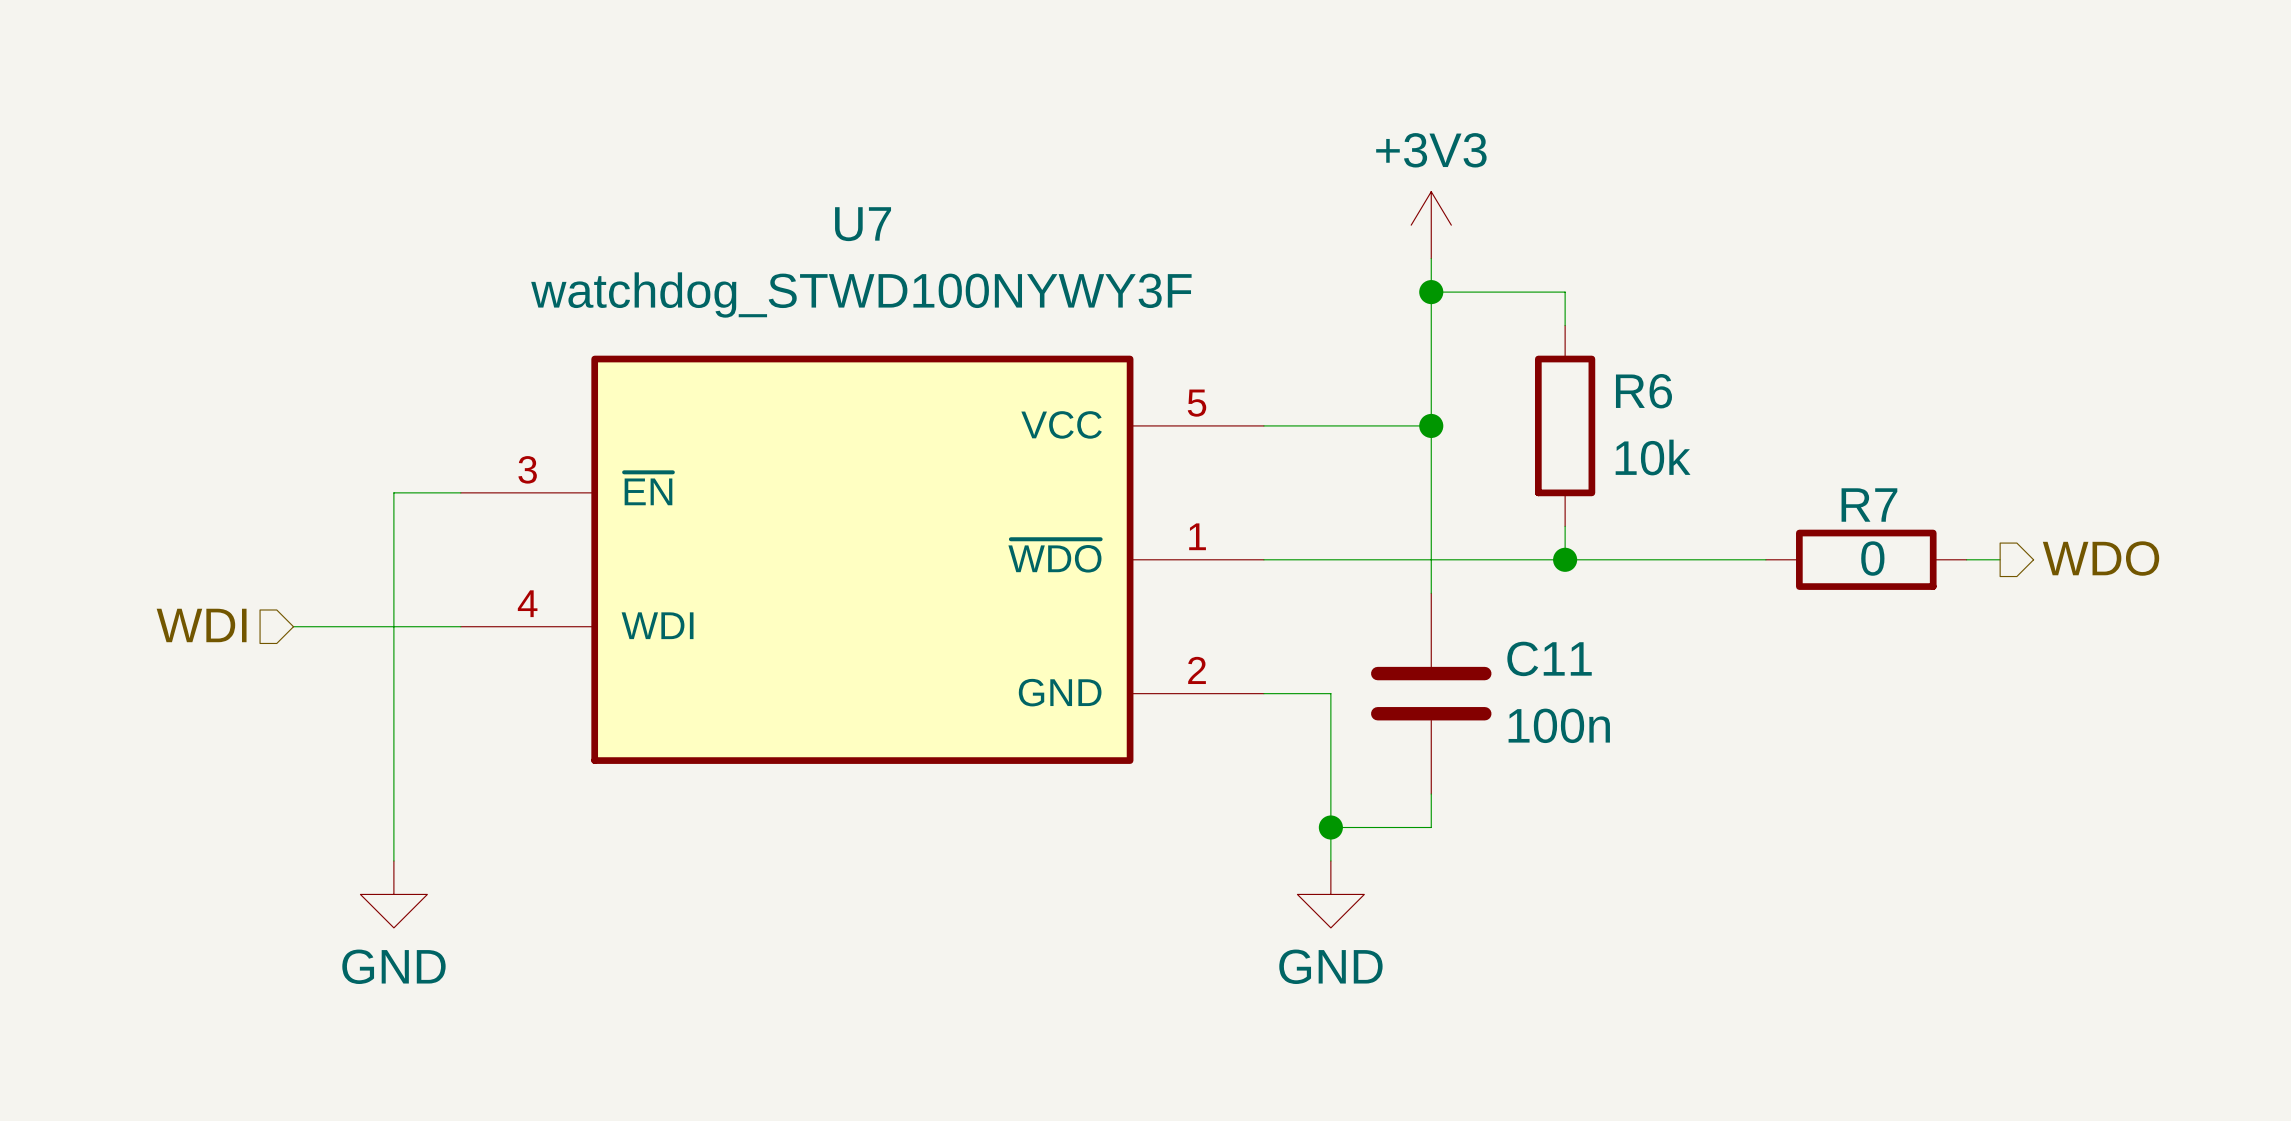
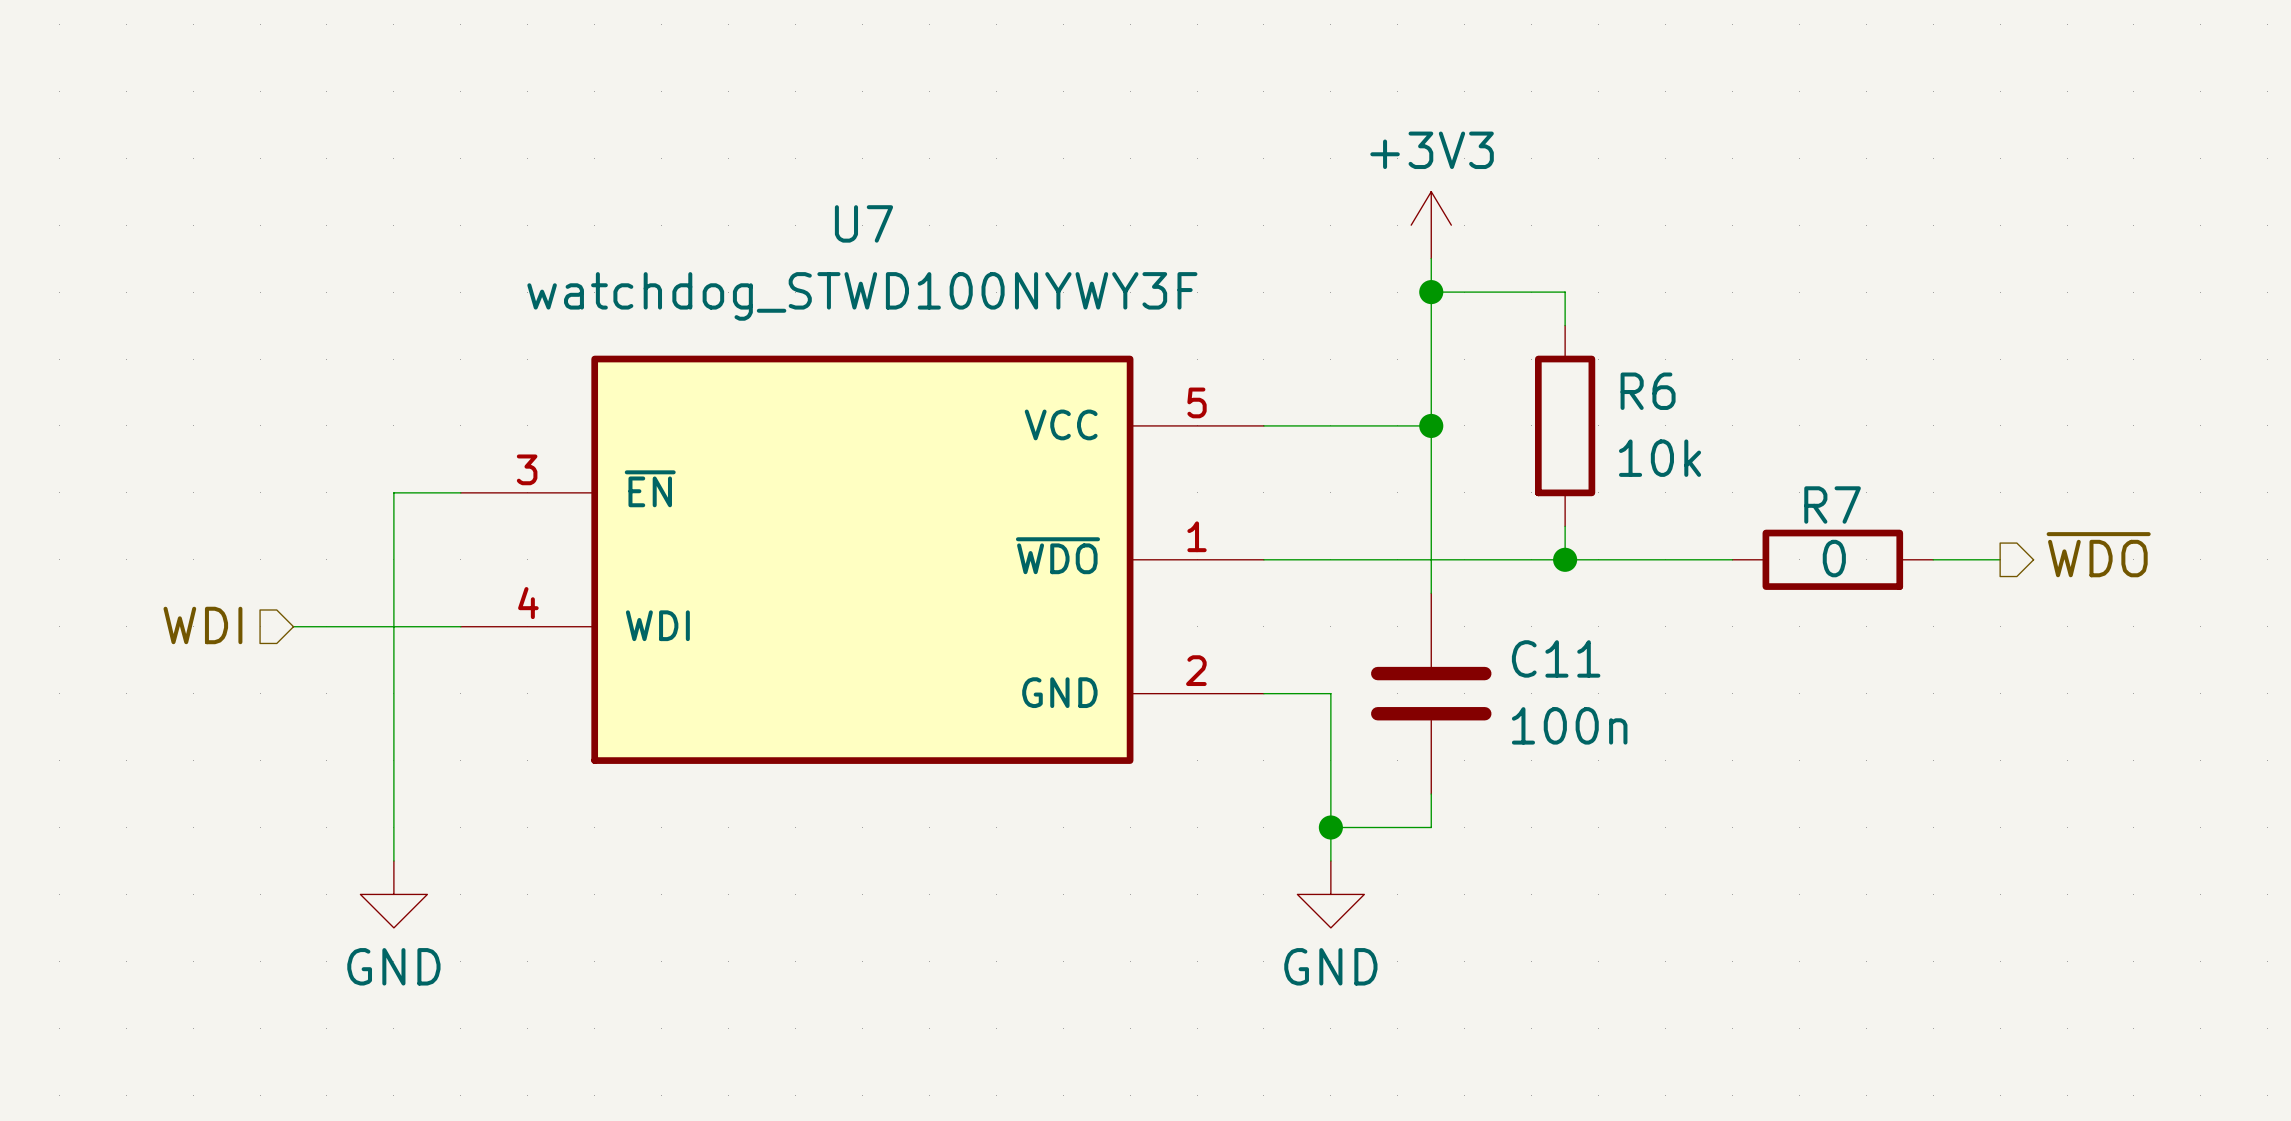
hierarchical label: WDO (2101, 558) -> ~{WDO} (2098, 554)
R7 position: (1866, 559) -> (1832, 559)

